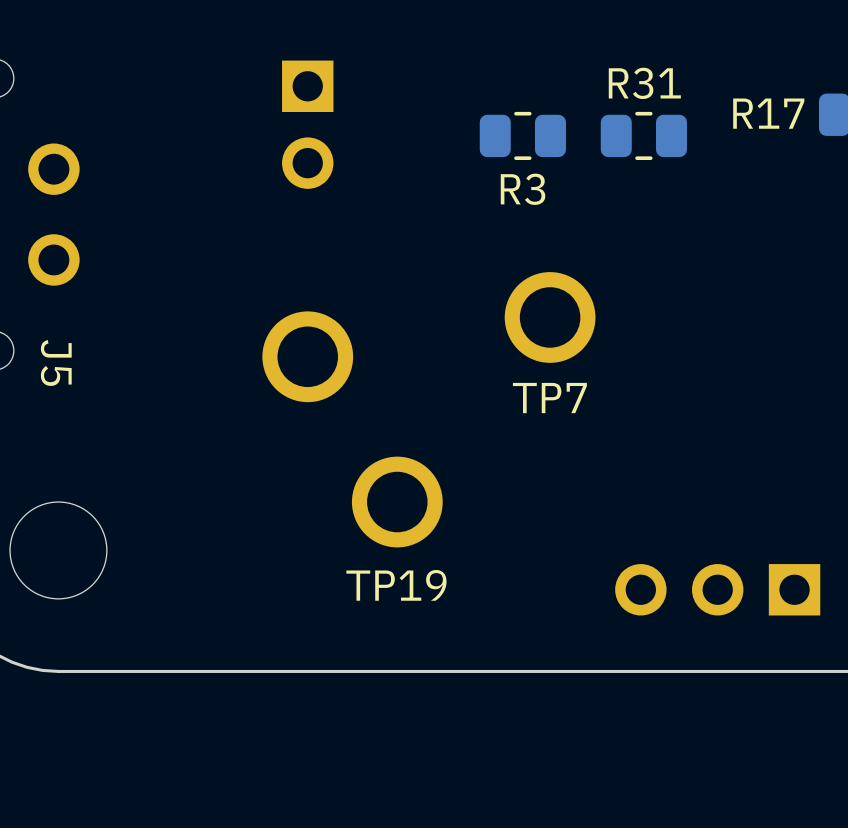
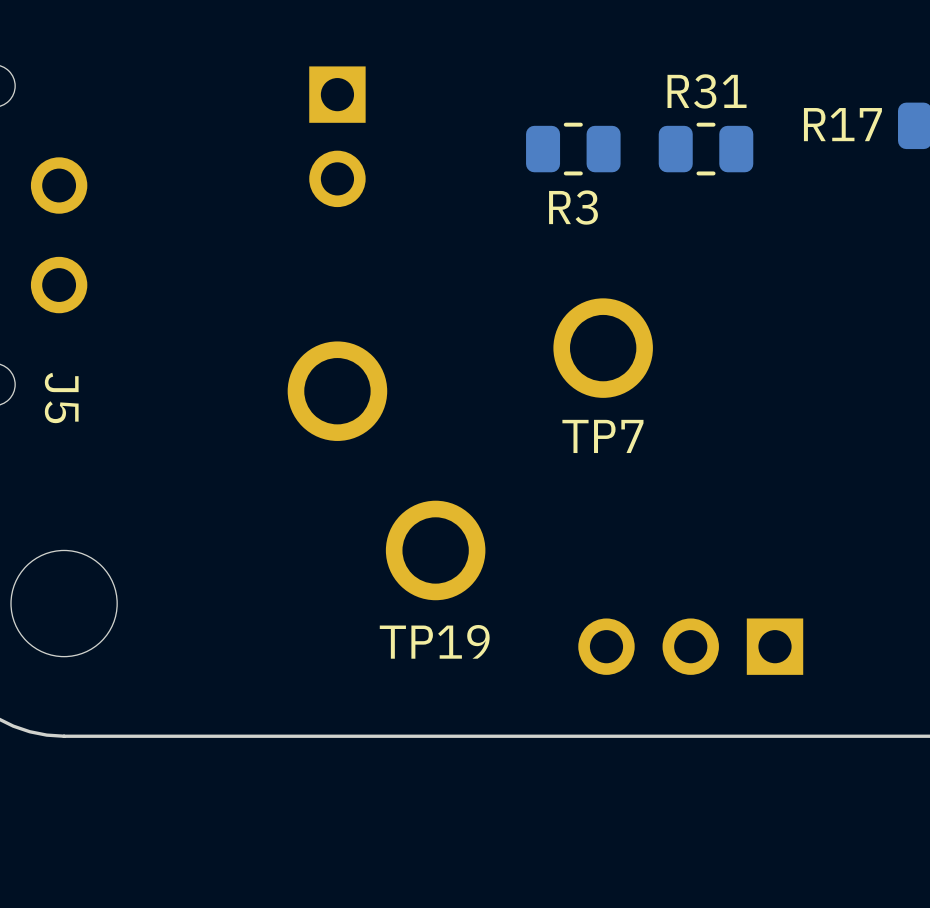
part position: (717, 589) -> (690, 646)

